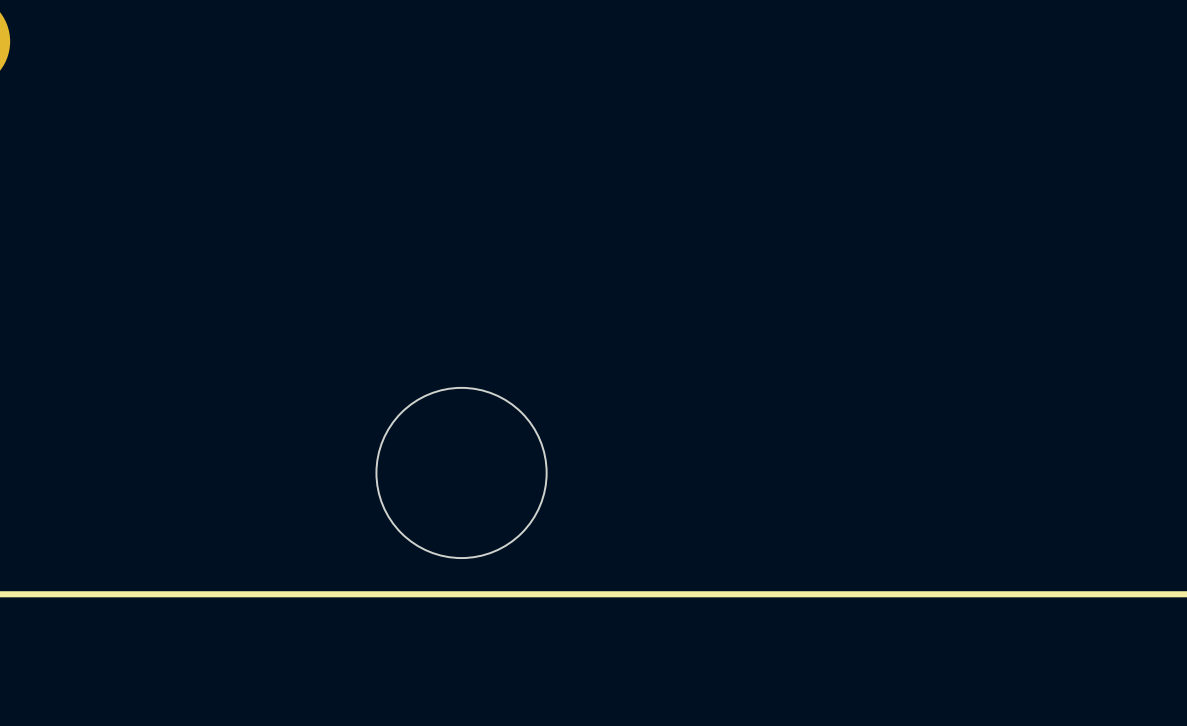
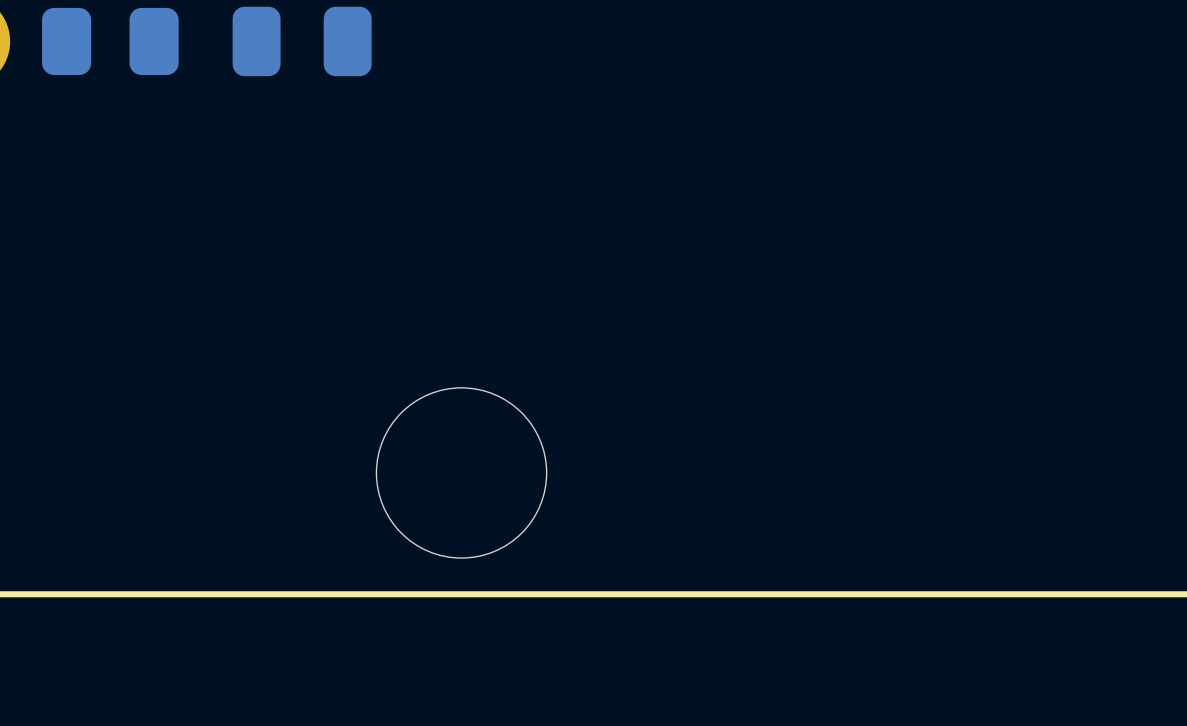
part: none -> (110, 41)
part: none -> (302, 41)

